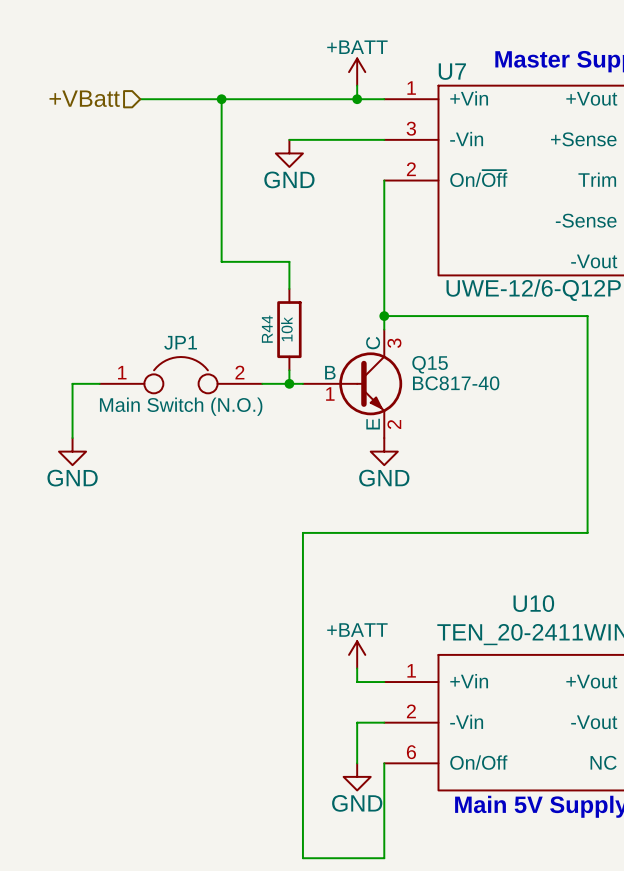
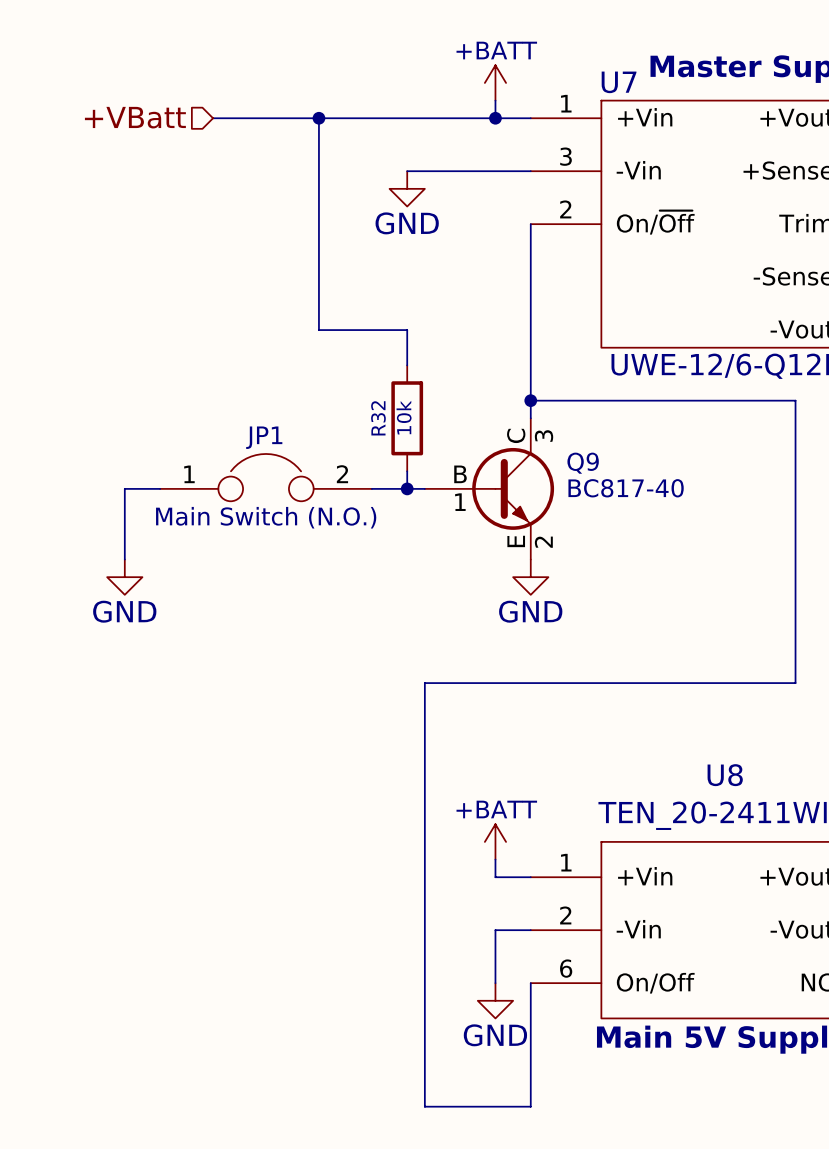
R44 name: R44 (267, 329) -> R32 (378, 418)
Q15 name: Q15 (430, 364) -> Q9 (583, 463)
U10 name: U10 (533, 603) -> U8 (725, 775)

